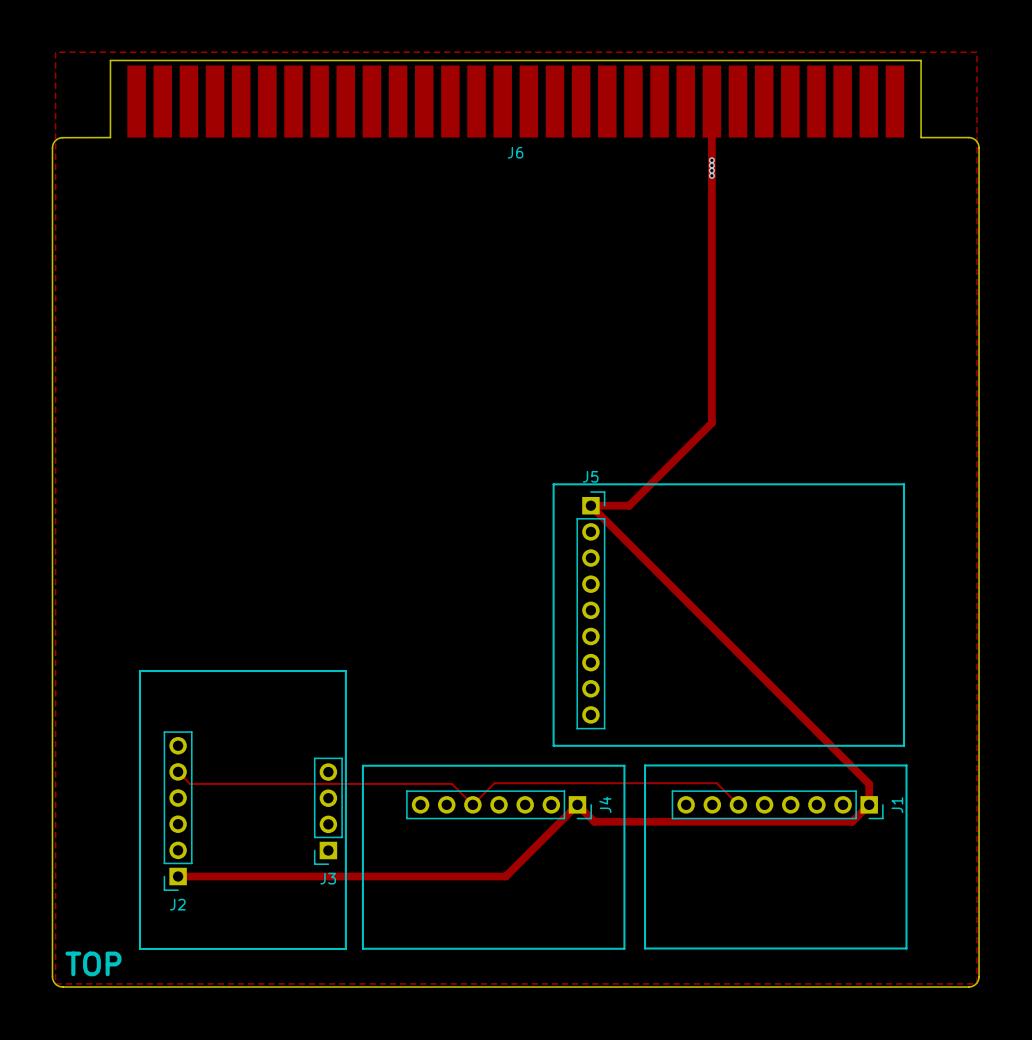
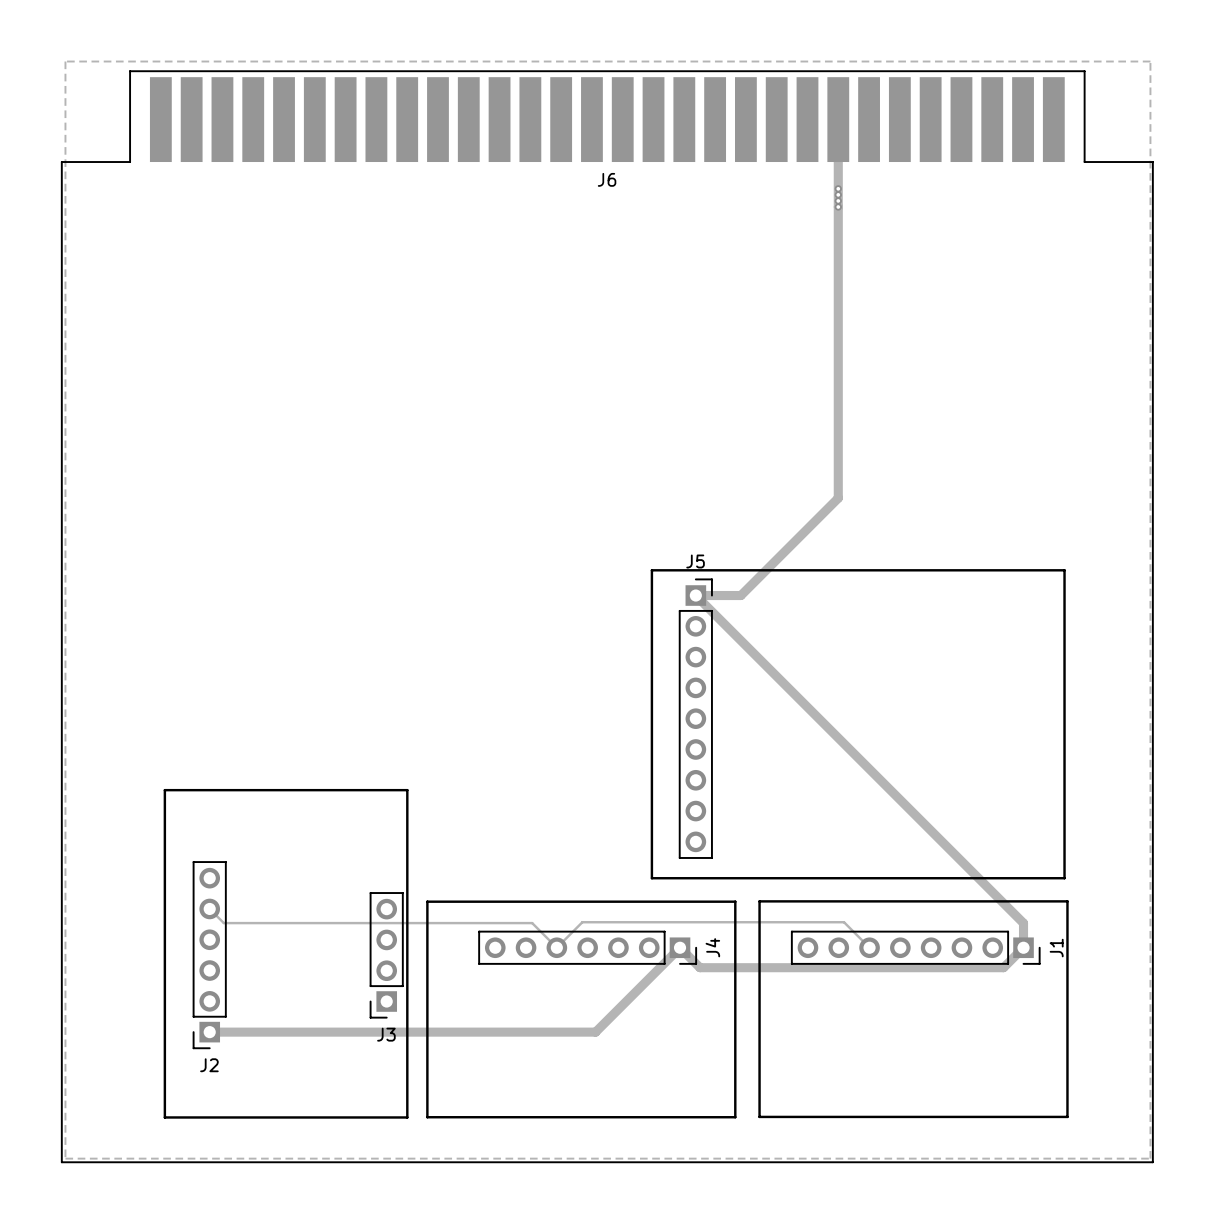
J6 footprint: [52, 60, 980, 988] -> [61, 70, 1154, 1163]

